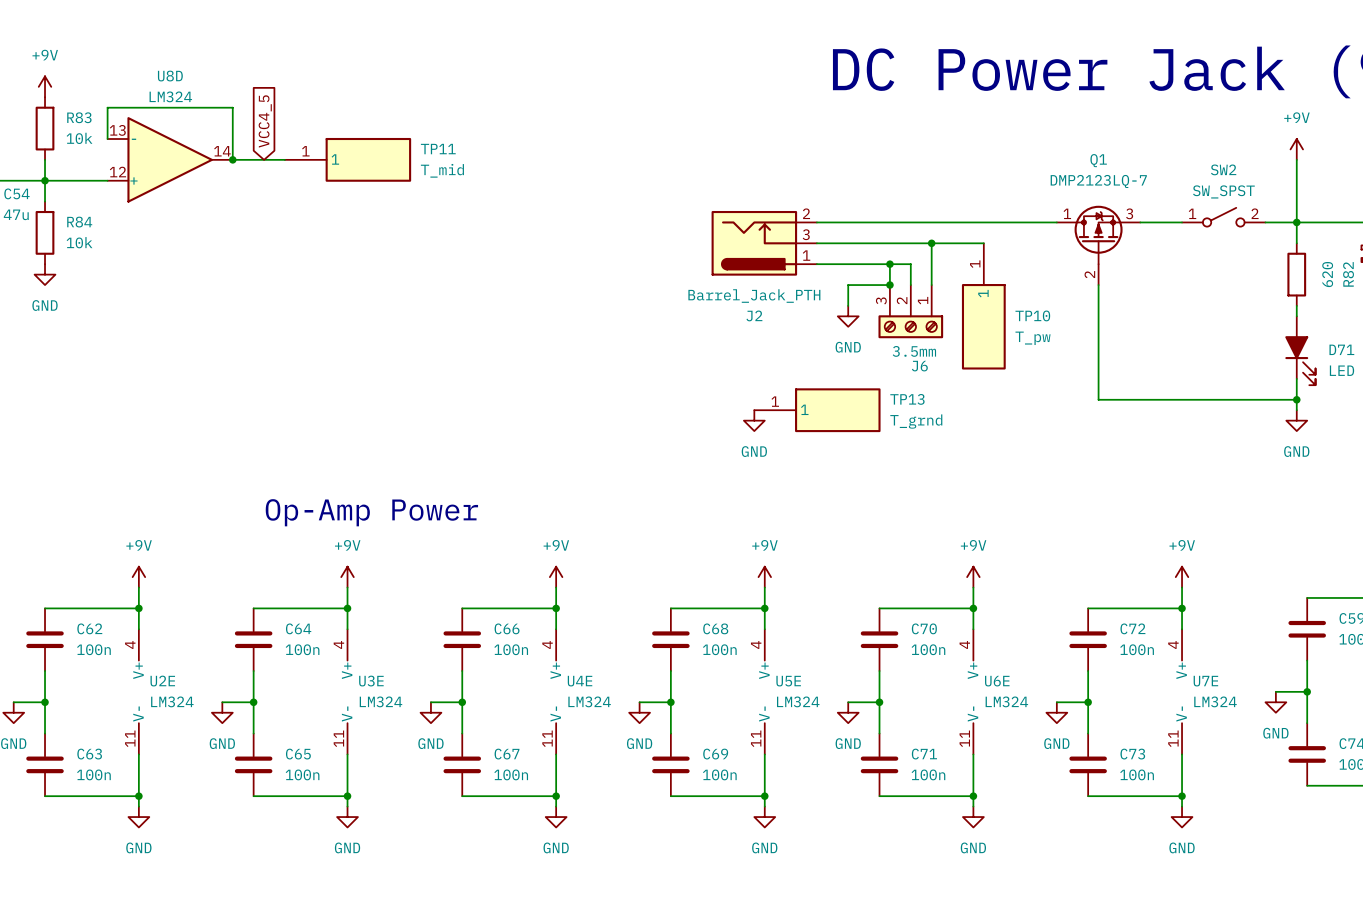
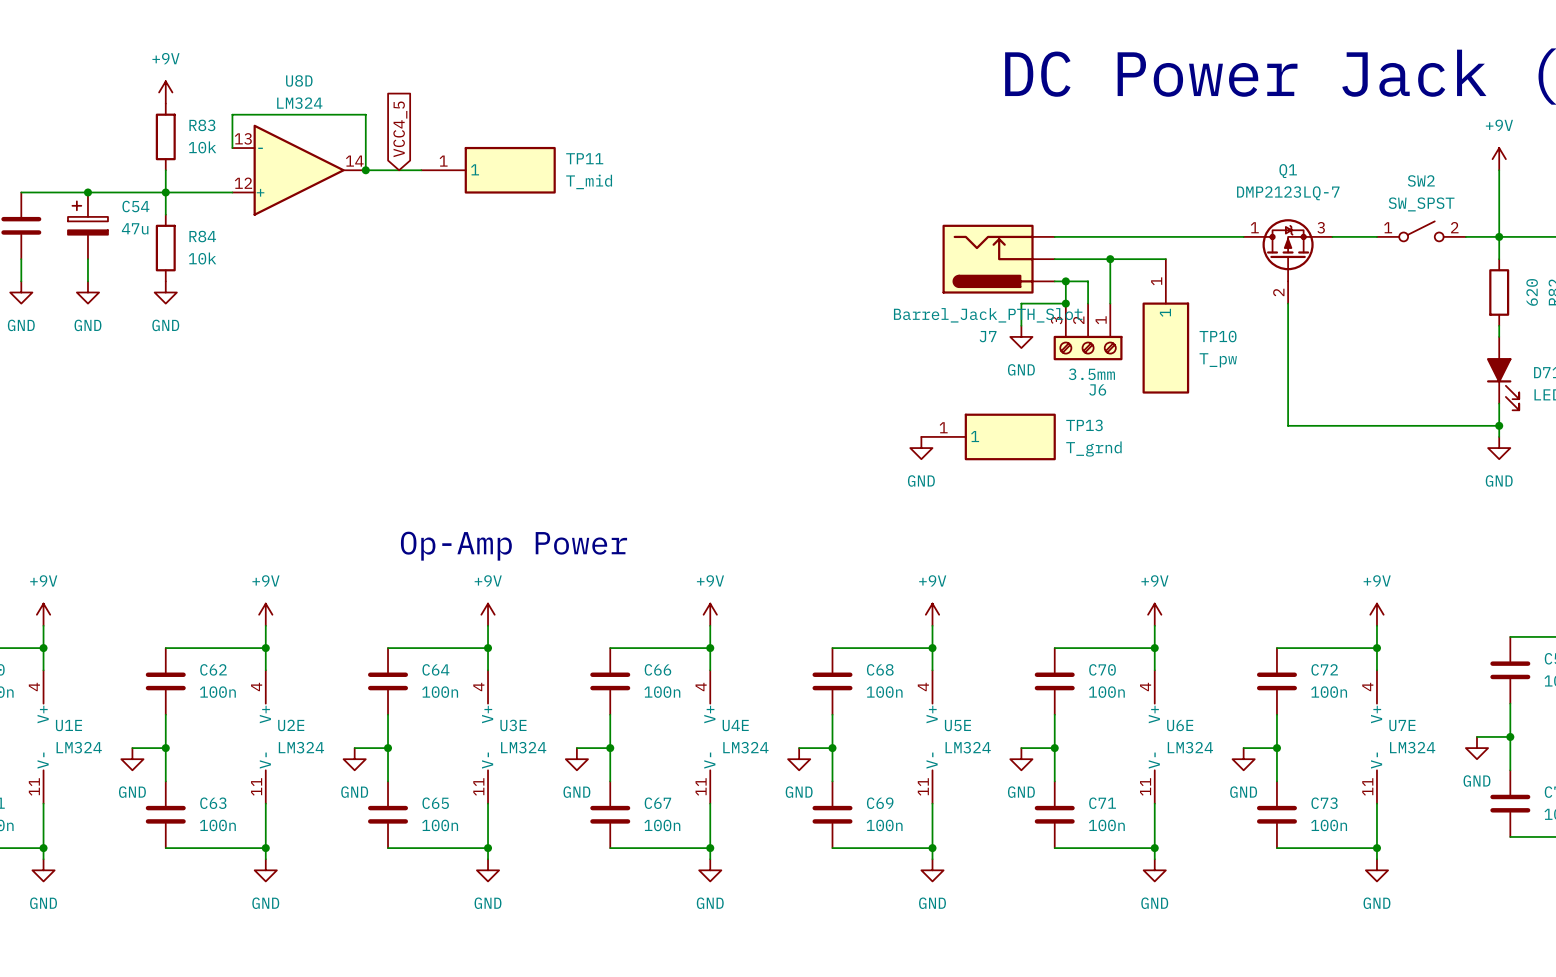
J2: Barrel_Jack_PTH (764, 243) -> none
J7: none -> Barrel_Jack_PTH_Slot (998, 259)

